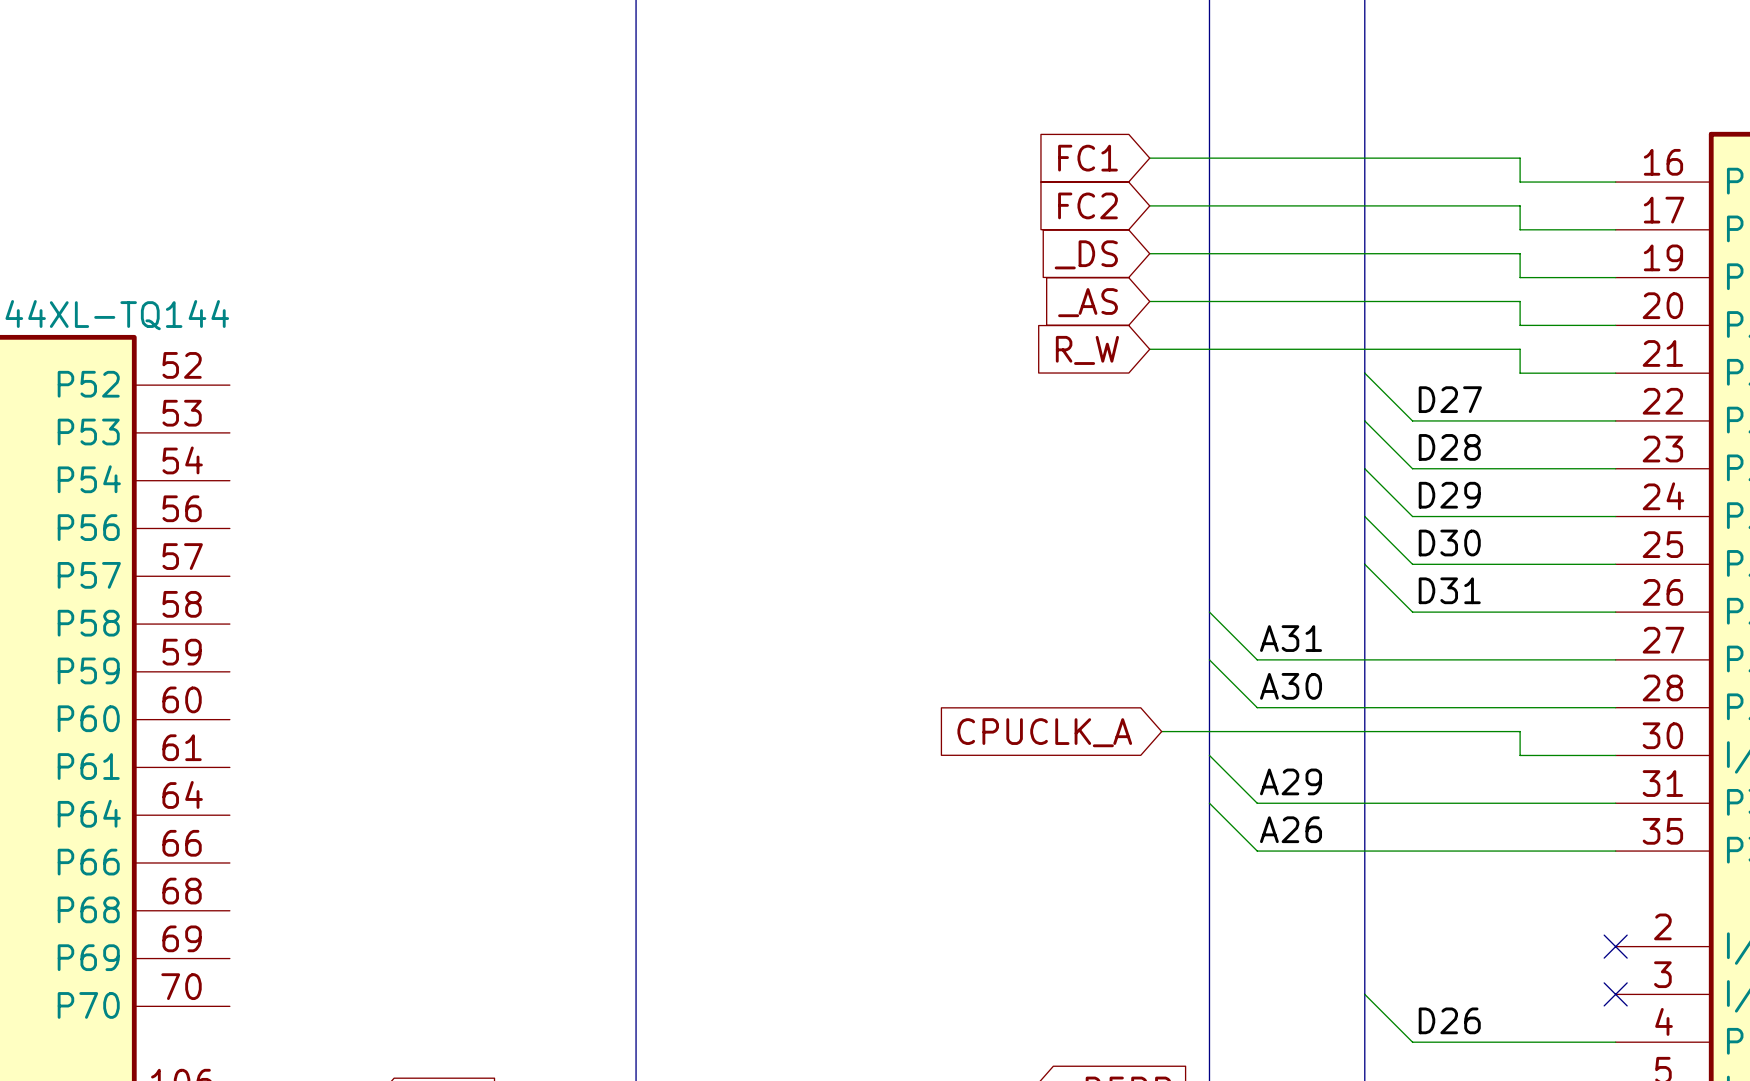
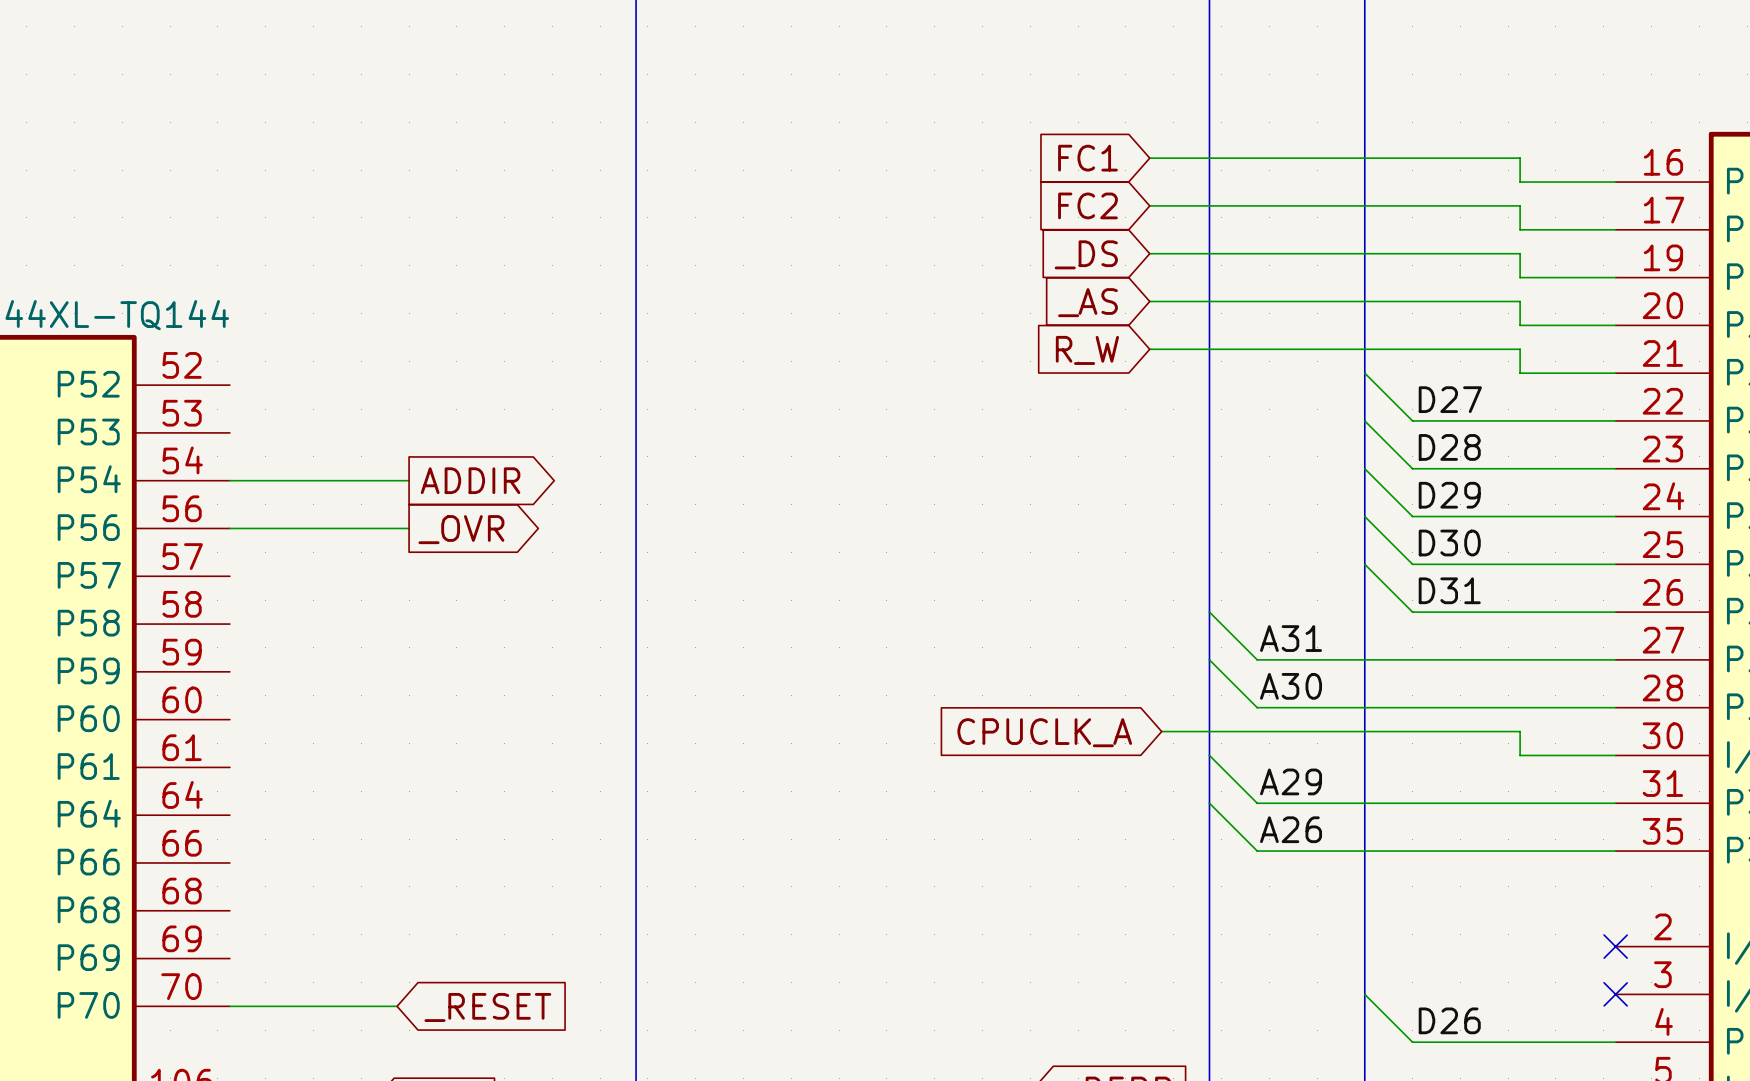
wire: none -> (229, 480) (409, 480)
global label: none -> ADDIR (470, 480)
wire: none -> (229, 528) (409, 528)
global label: none -> _OVR (461, 529)
wire: none -> (229, 1006) (397, 1006)
global label: none -> _RESET (487, 1007)

